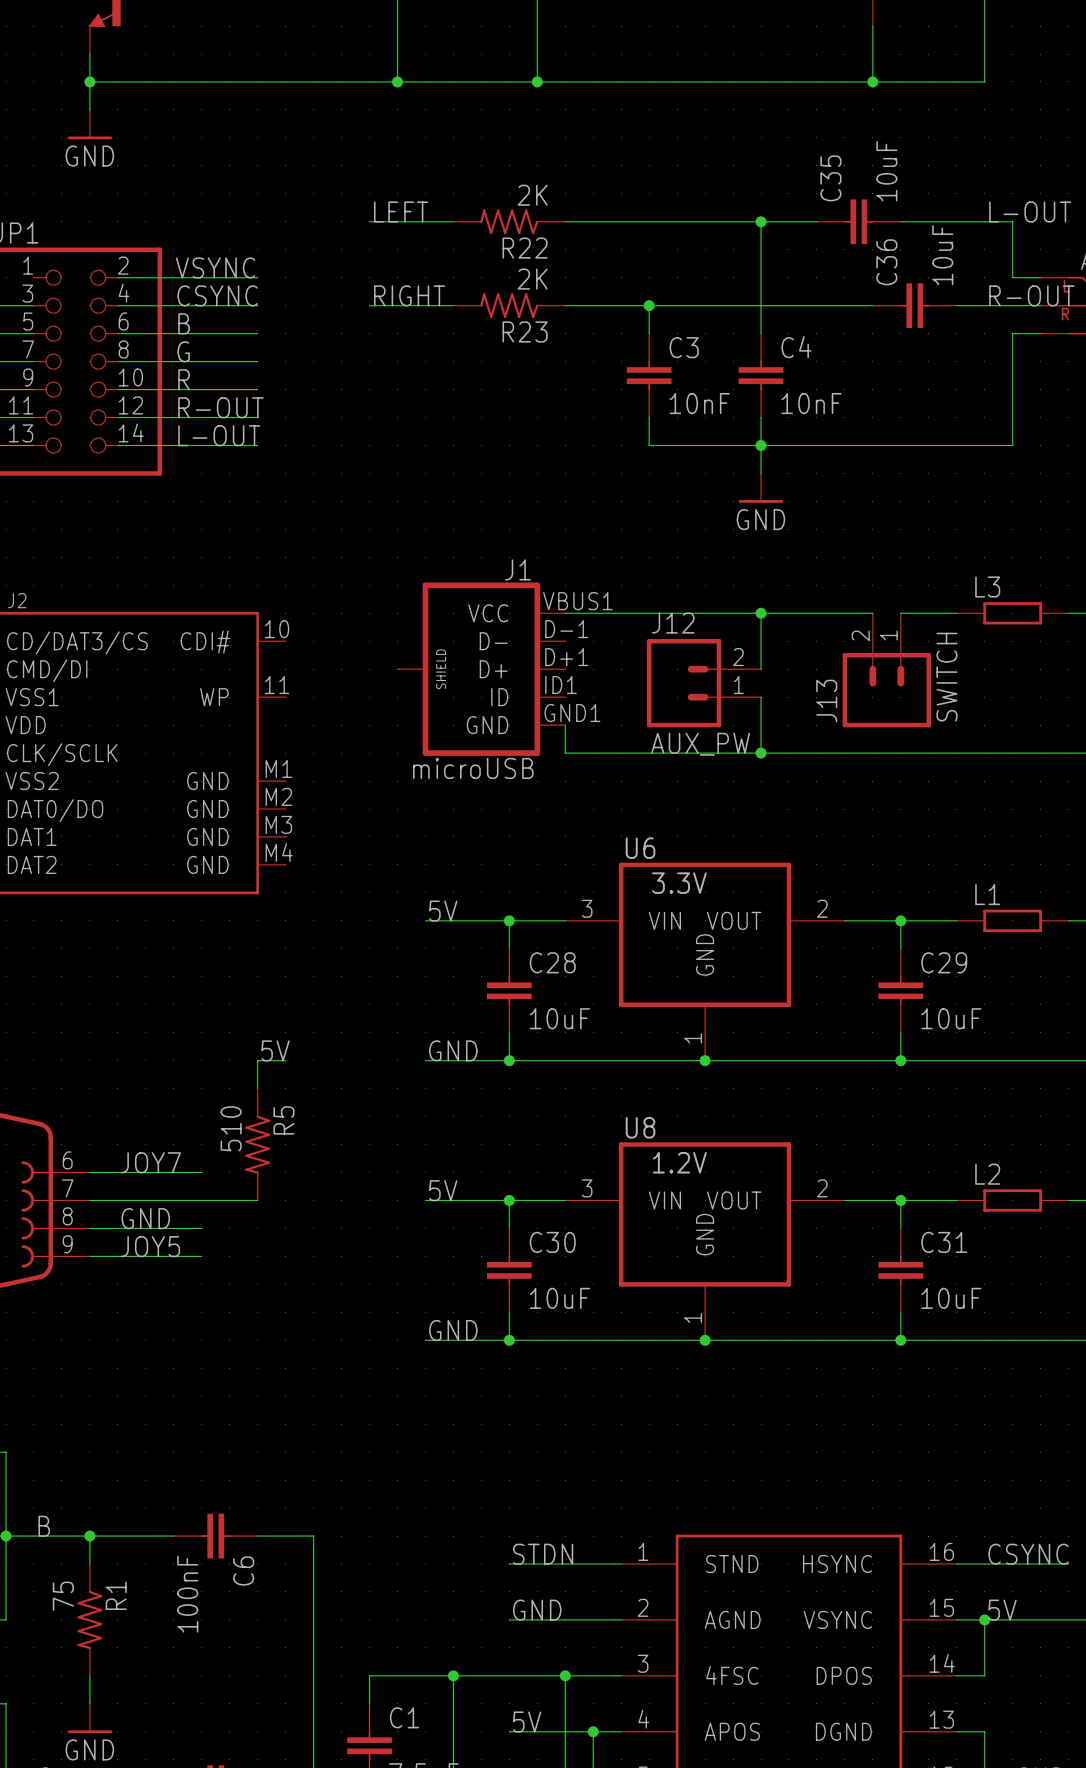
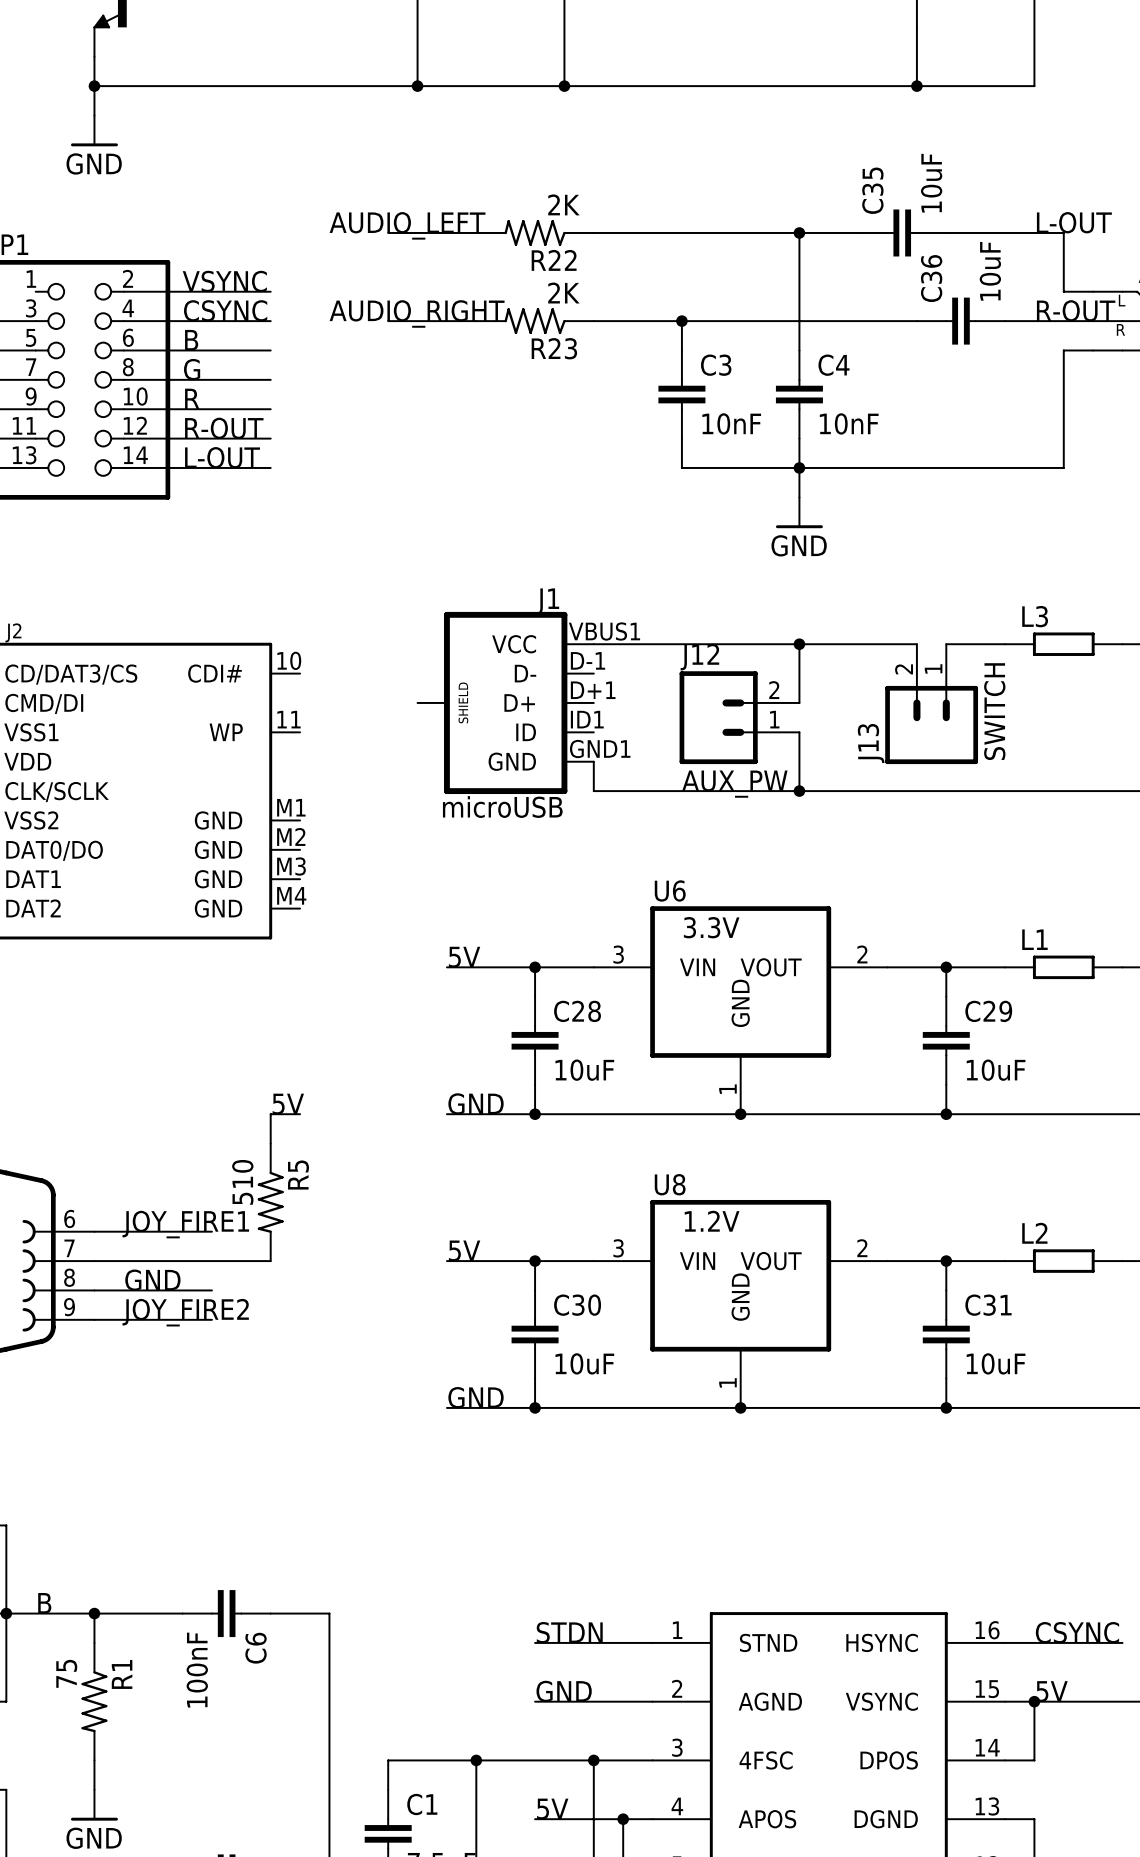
label: none -> AUDIO_LEFT (407, 225)
label: LEFT (401, 212) -> none
label: RIGHT (409, 295) -> AUDIO_RIGHT (417, 313)
label: JOY7 (150, 1162) -> JOY_FIRE1 (185, 1224)
label: JOY5 (150, 1246) -> JOY_FIRE2 (185, 1312)

